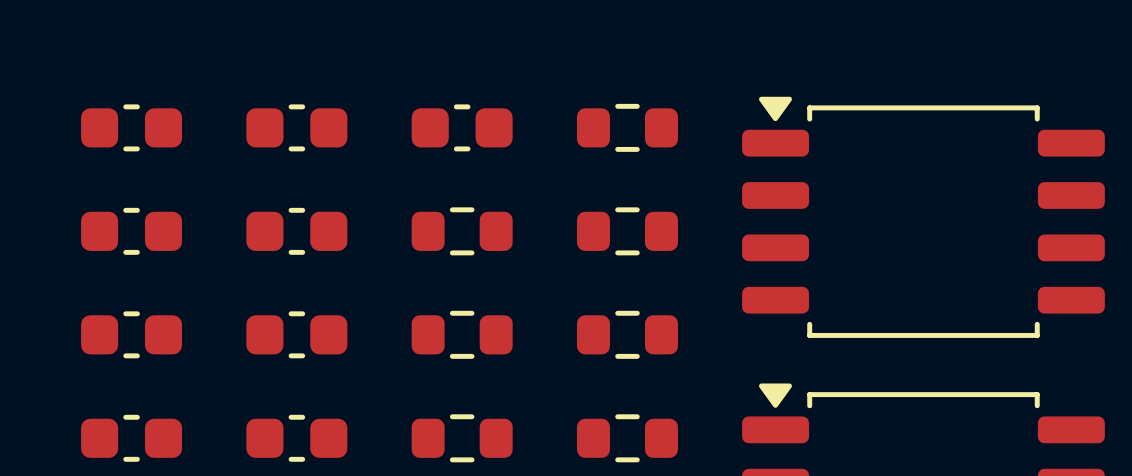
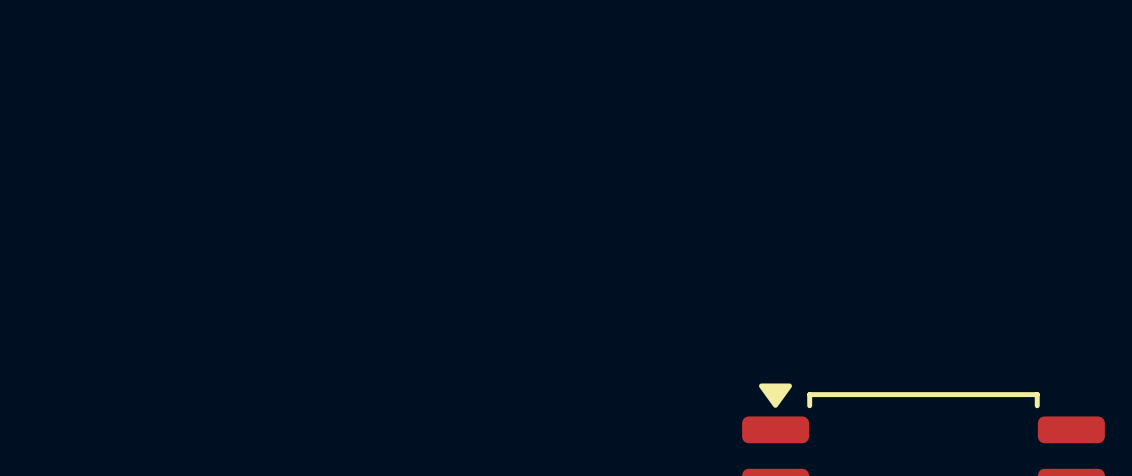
part: (131, 127) -> none
part: (296, 127) -> none
part: (462, 127) -> none
part: (627, 127) -> none
part: (923, 217) -> none
part: (131, 231) -> none
part: (296, 231) -> none
part: (462, 231) -> none
part: (627, 231) -> none
part: (131, 334) -> none
part: (296, 334) -> none
part: (462, 334) -> none
part: (627, 334) -> none
part: (131, 438) -> none
part: (296, 438) -> none
part: (462, 438) -> none
part: (627, 438) -> none

